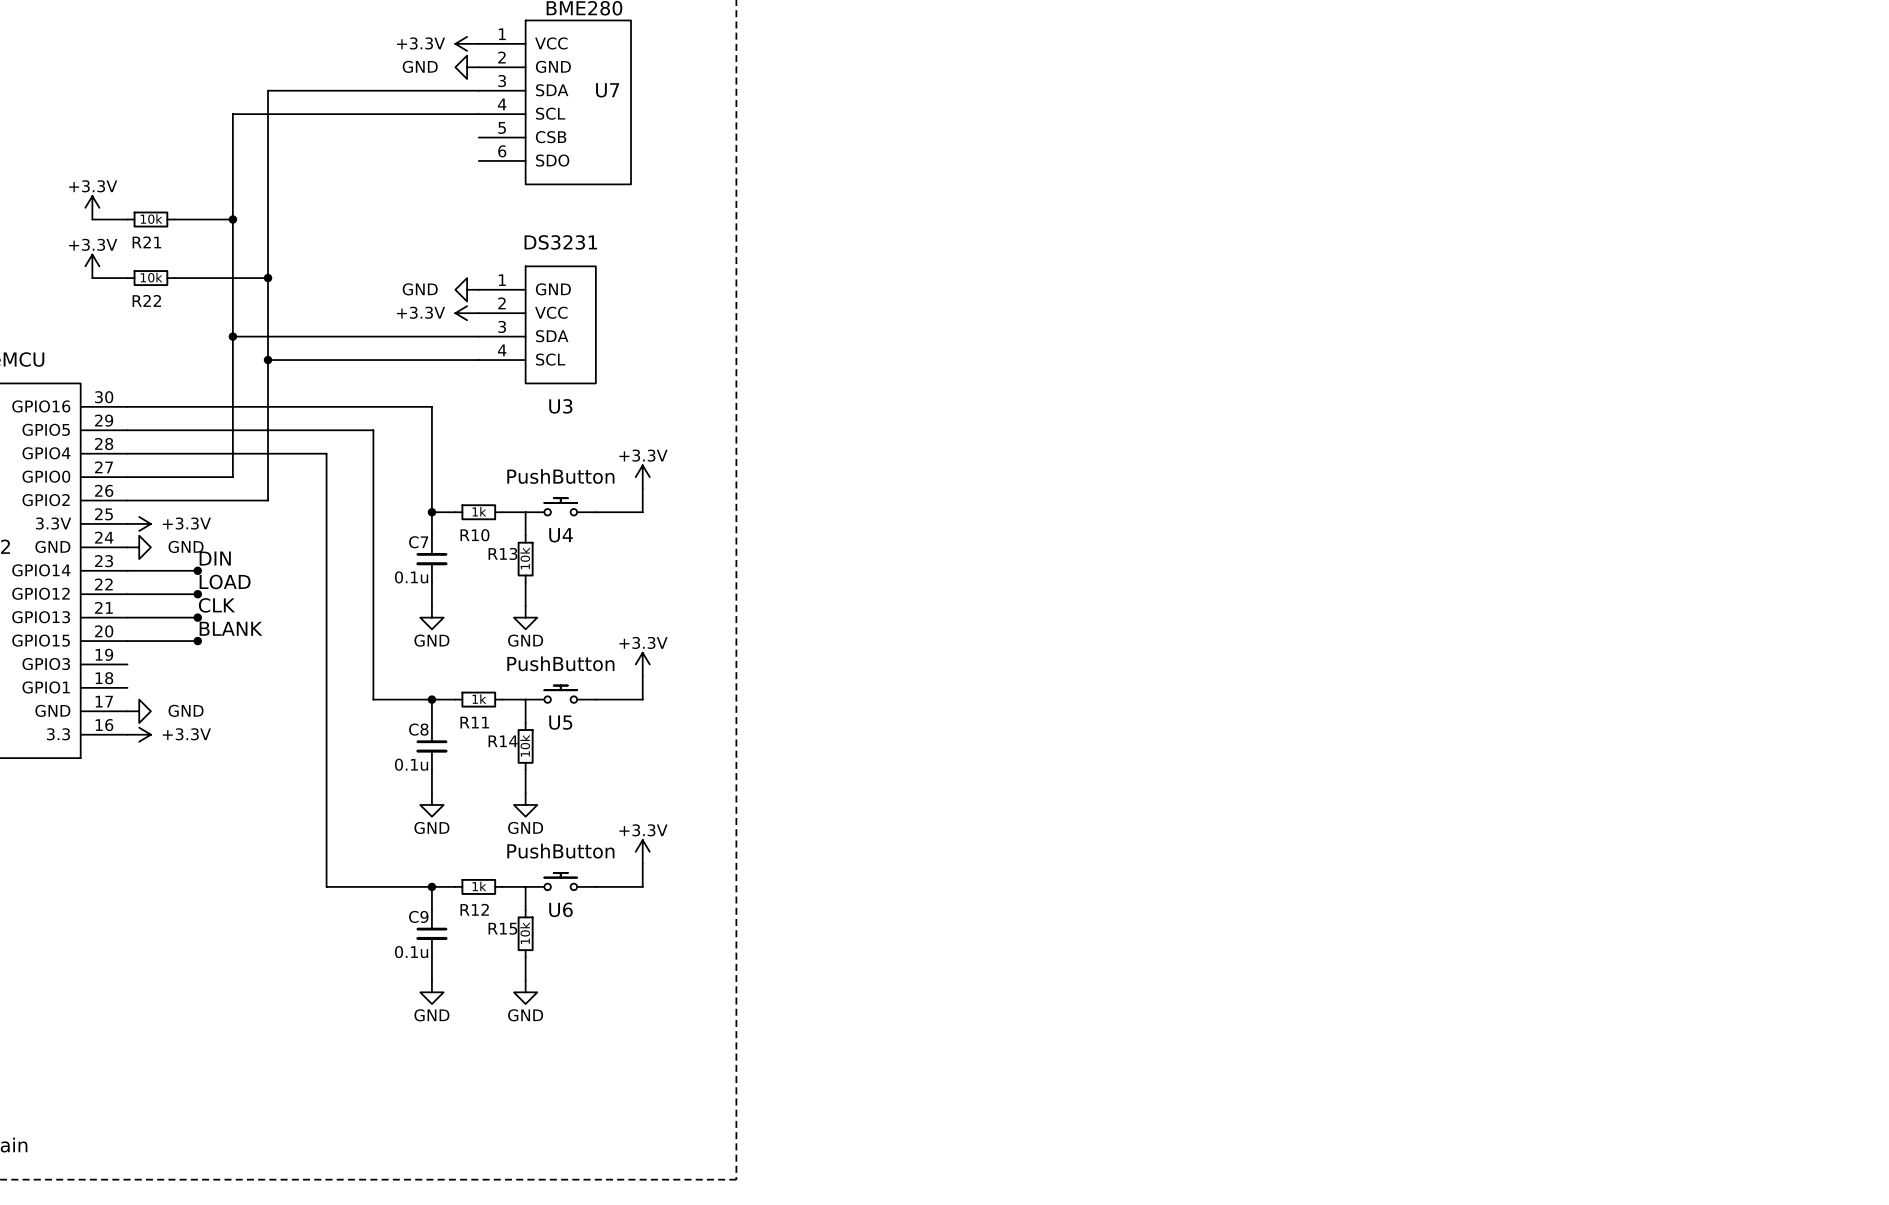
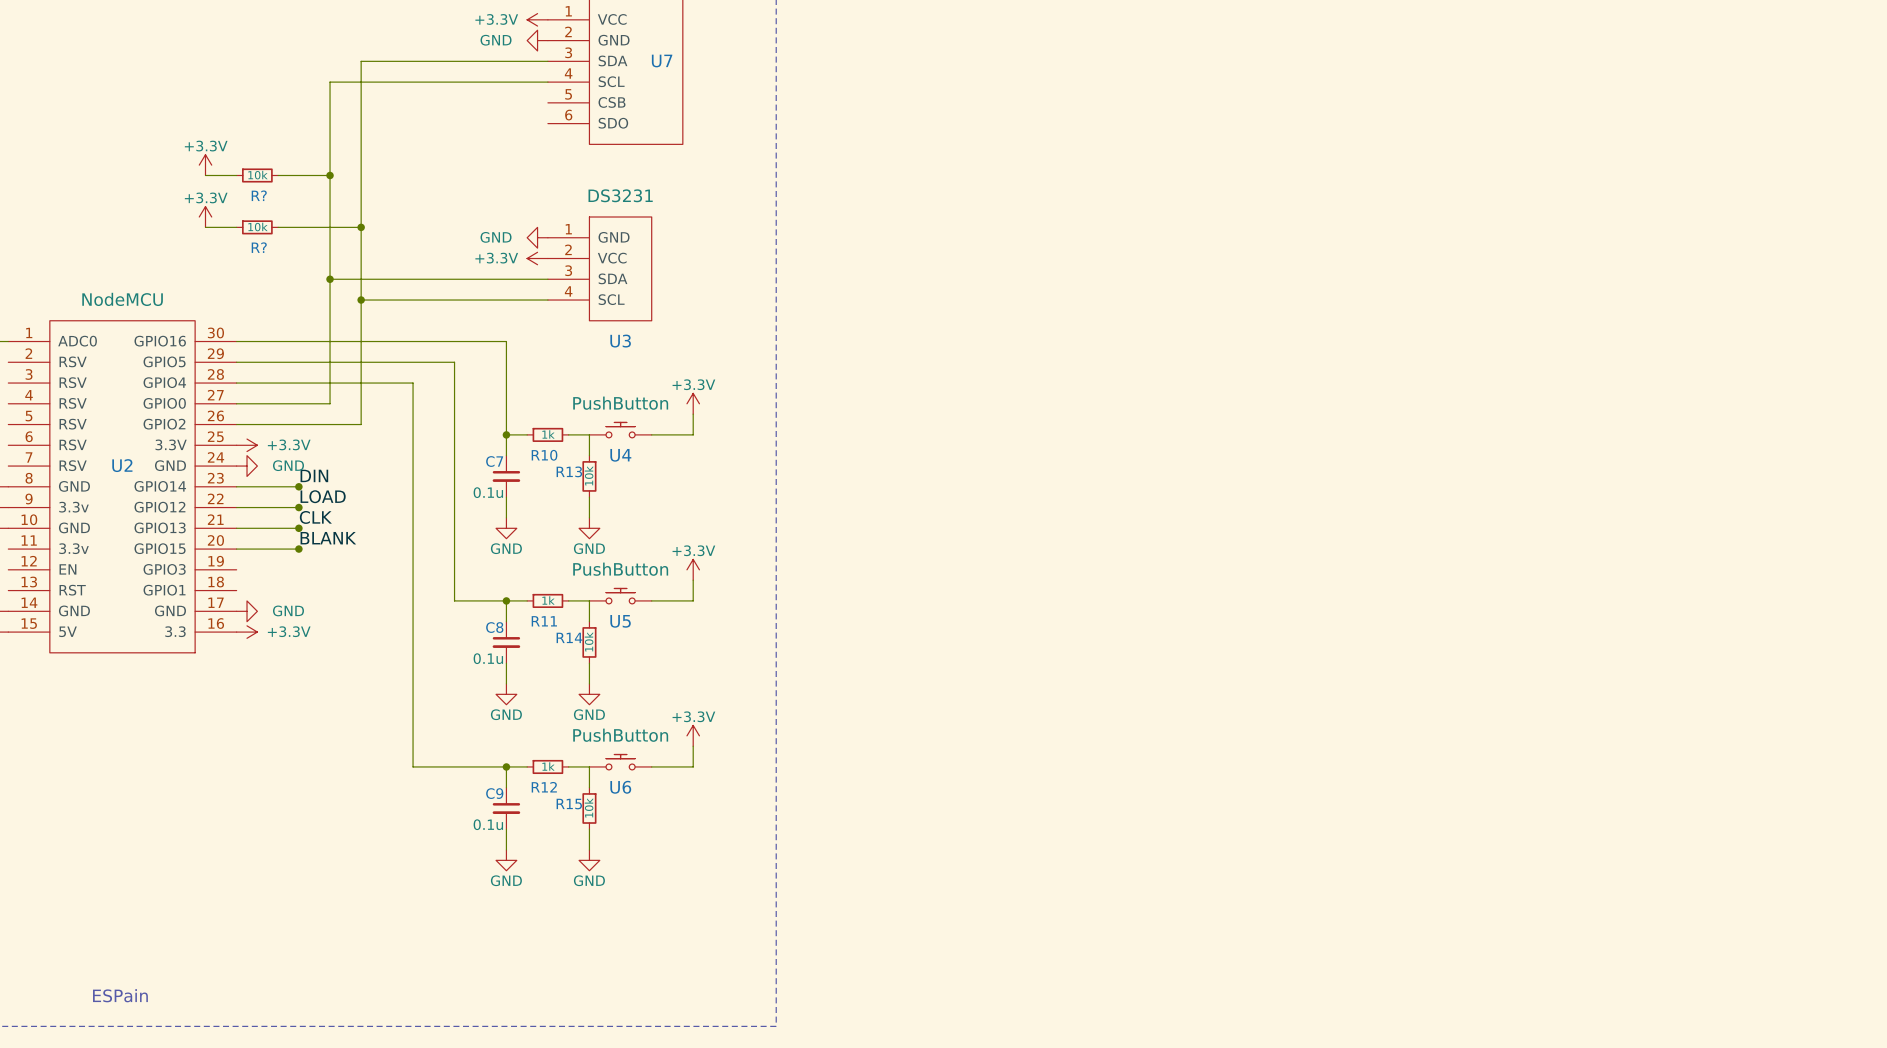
R21 name: R21 (146, 242) -> R? (259, 195)
R22 name: R22 (146, 300) -> R? (259, 247)

